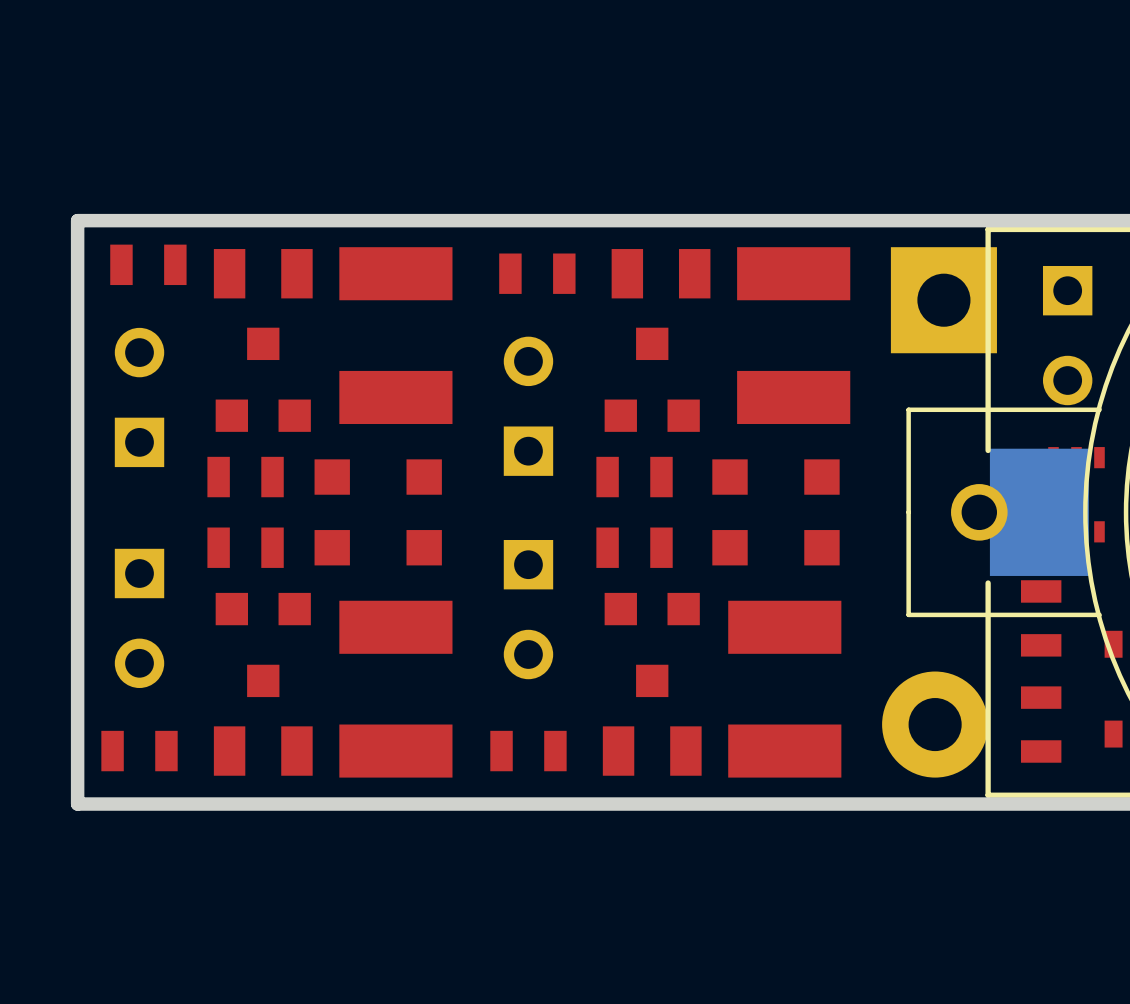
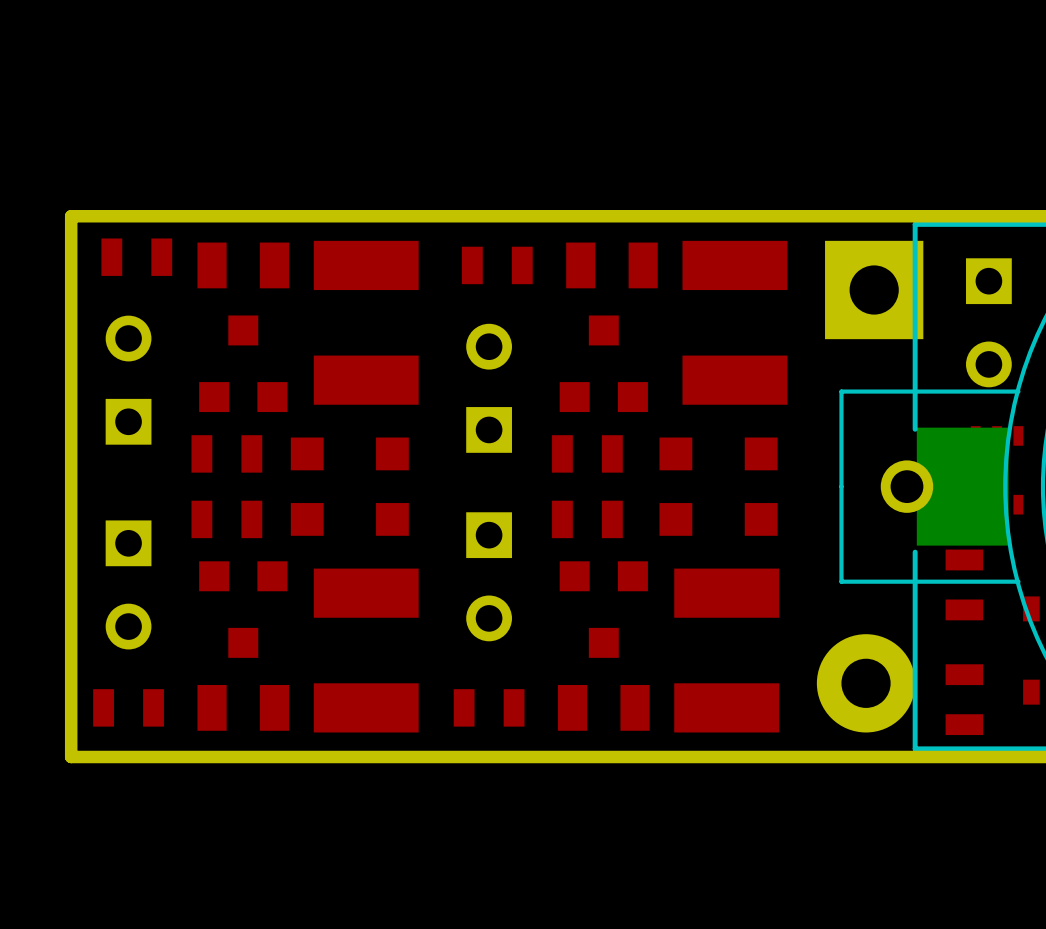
part position: (1041, 724) -> (964, 699)

